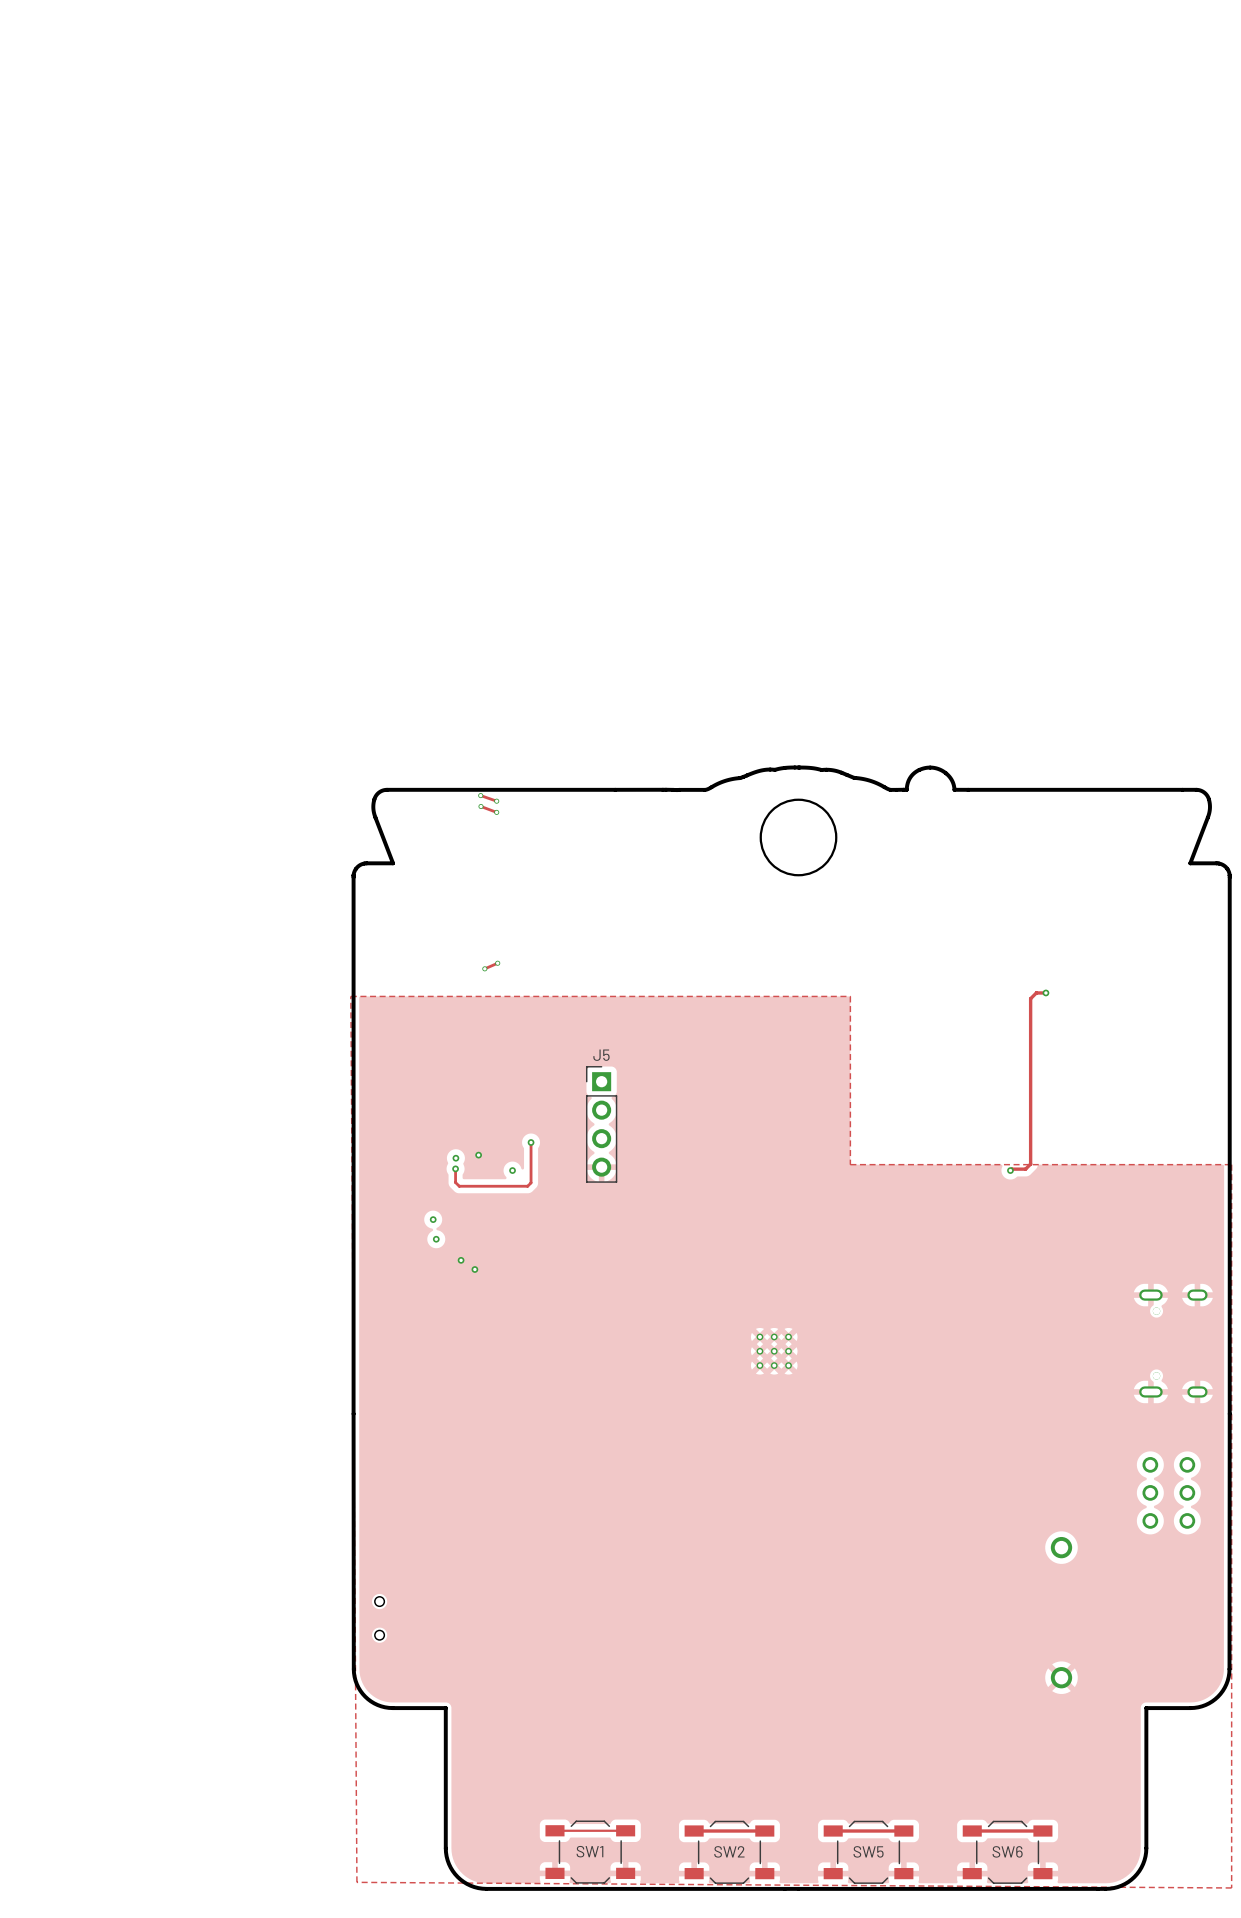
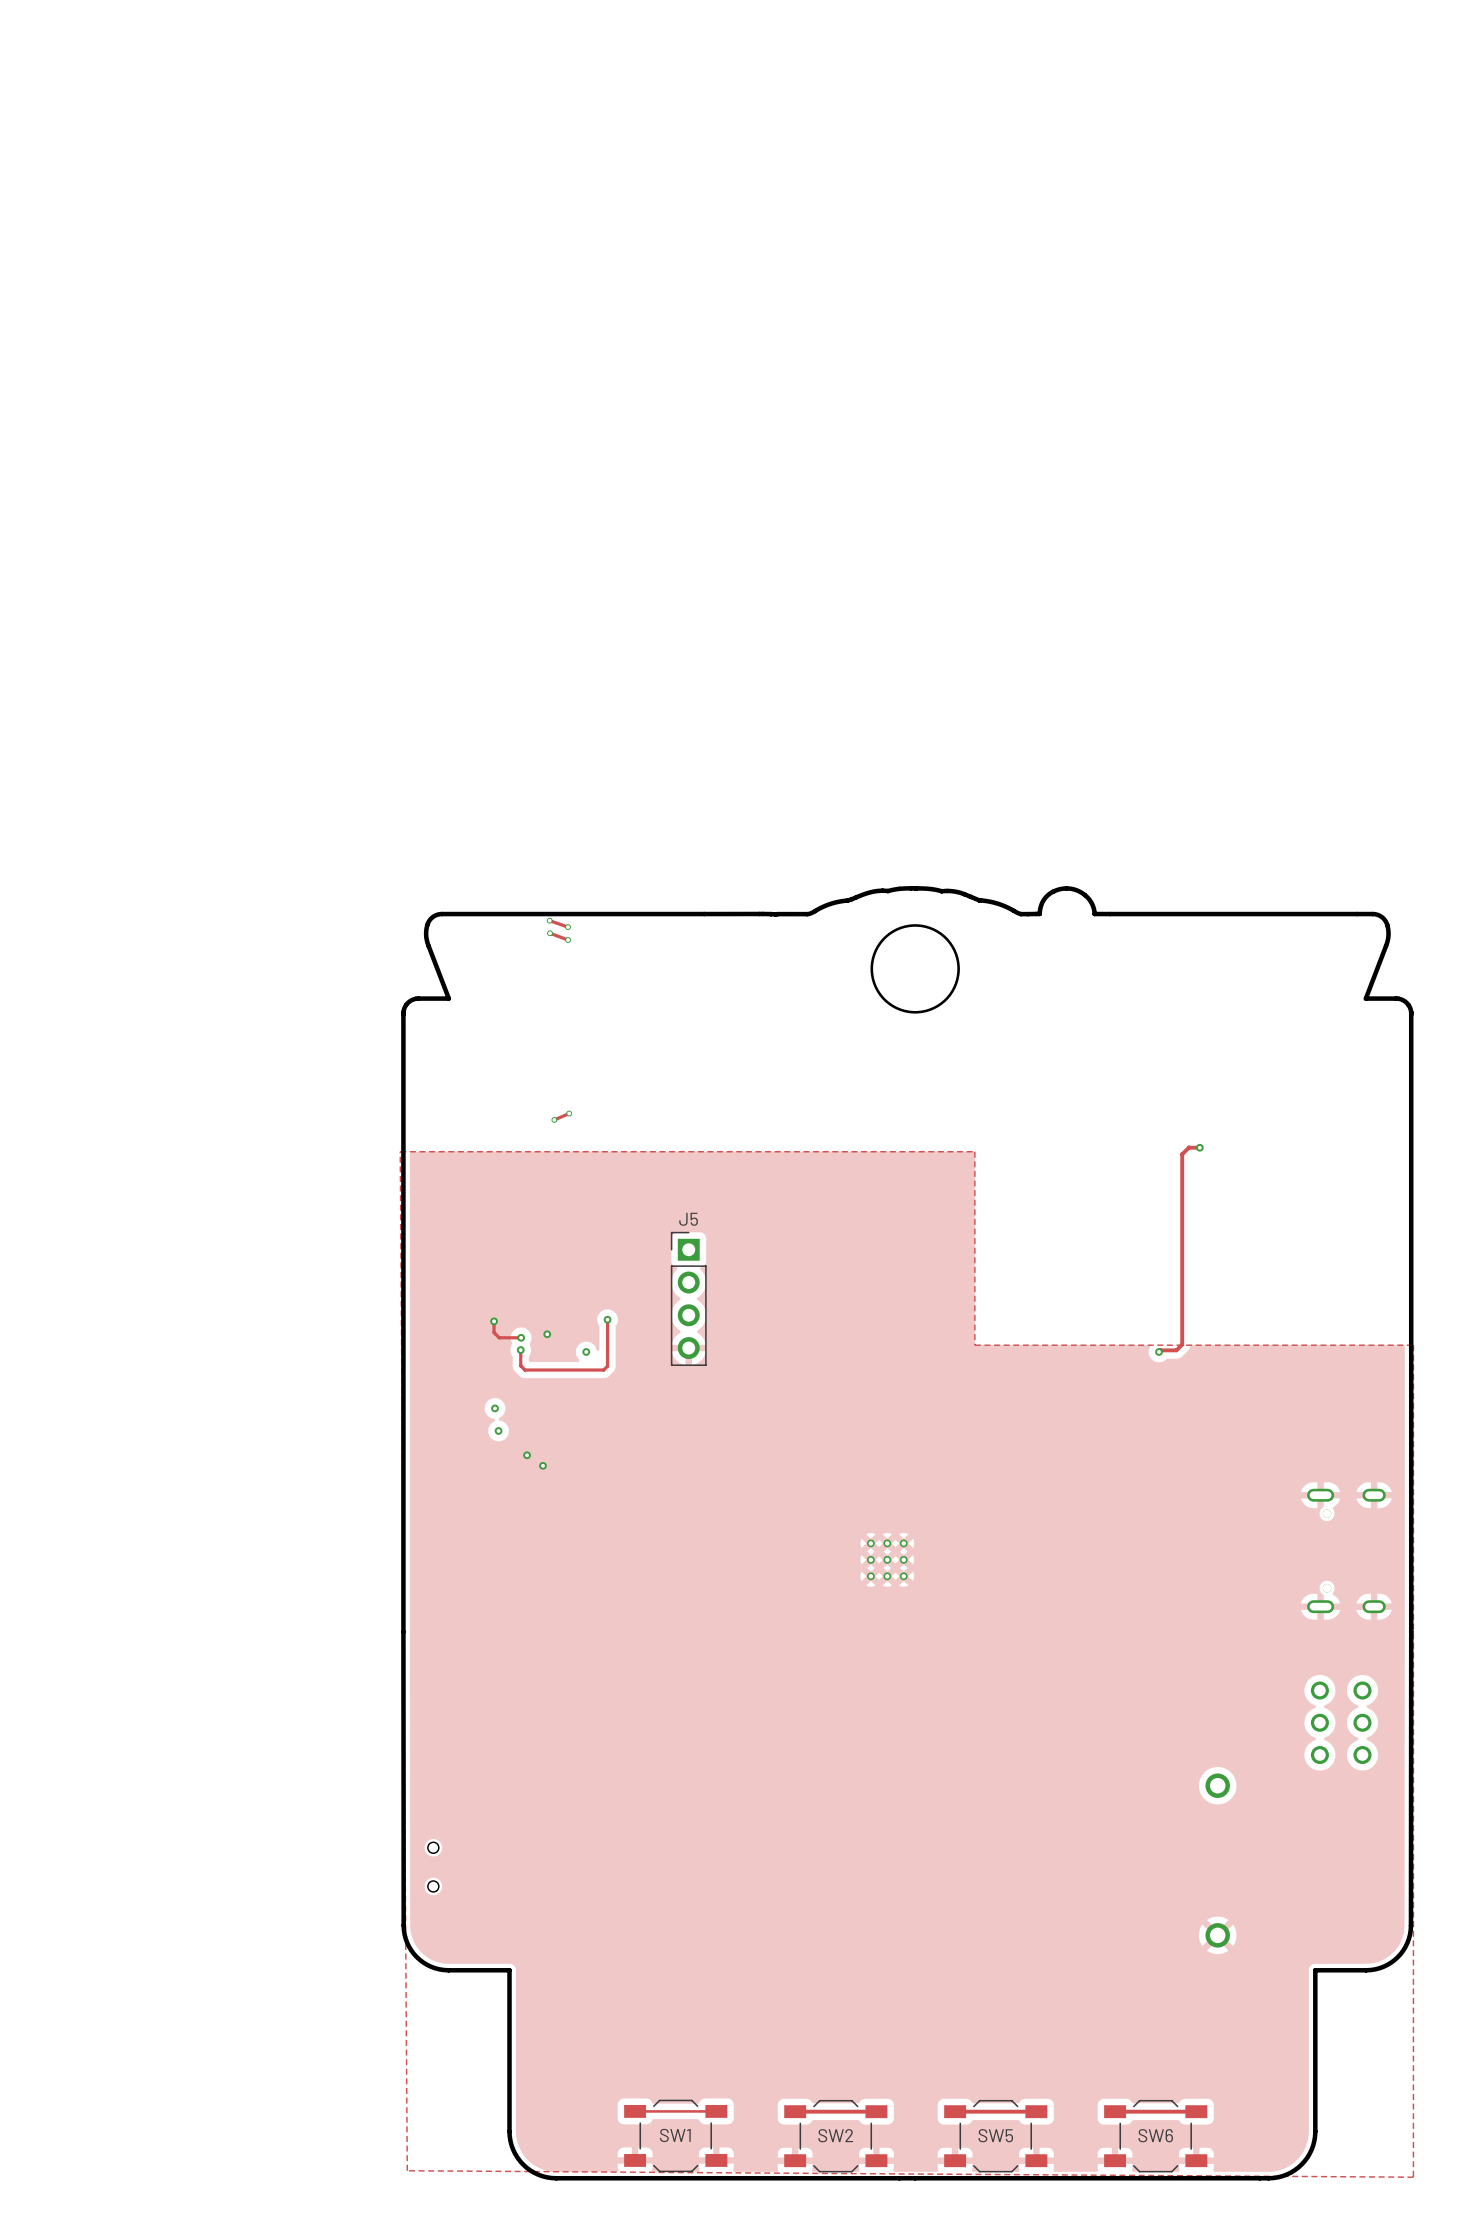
track: none -> (494, 1321) (494, 1332) (499, 1337) (521, 1337)
via: none -> (494, 1321)

